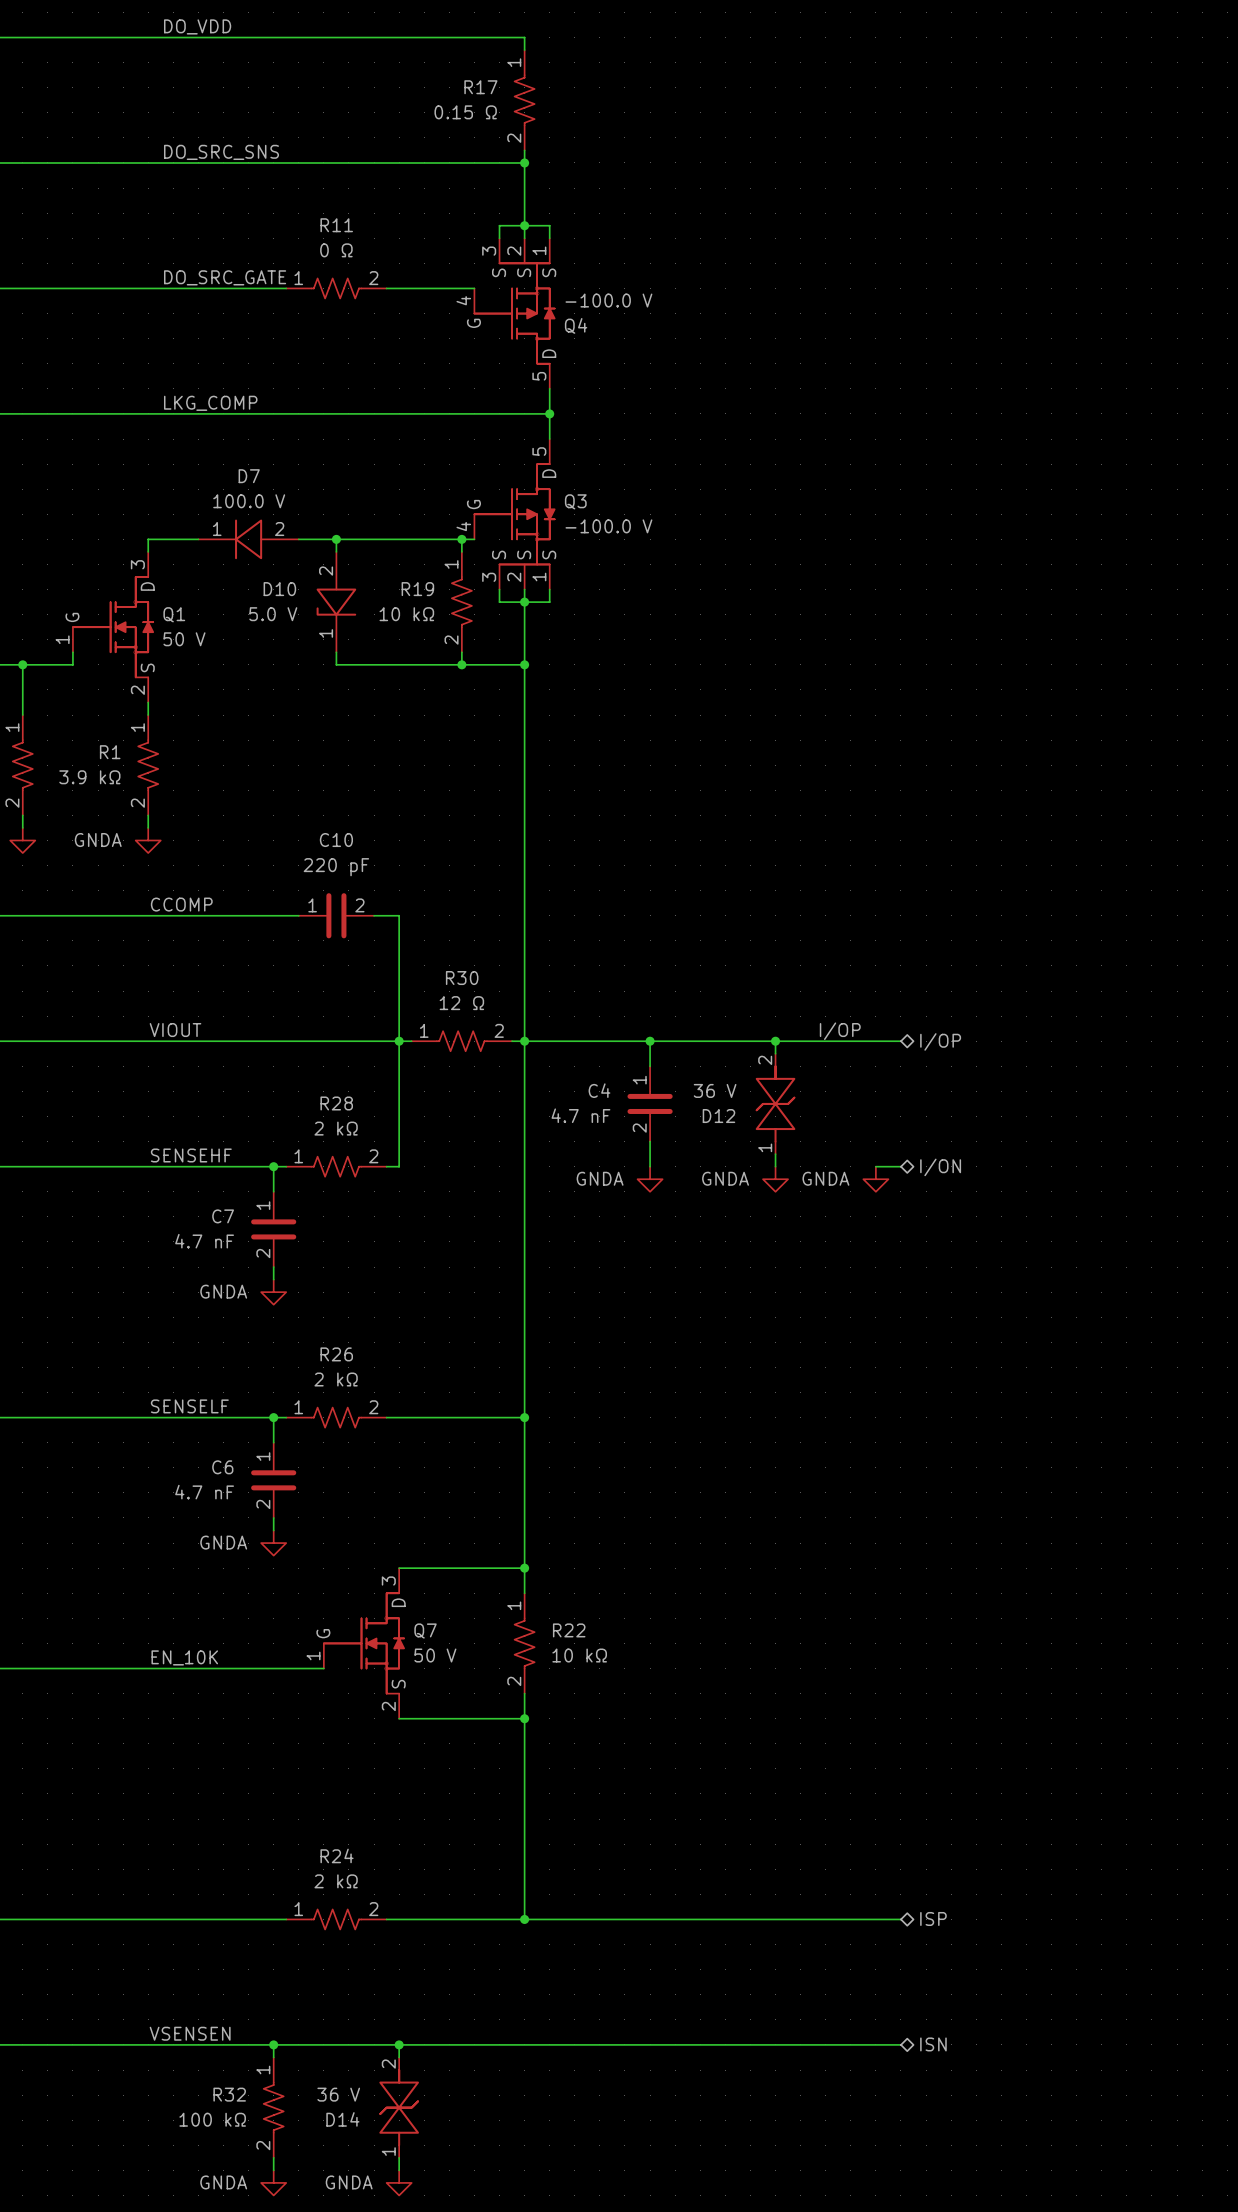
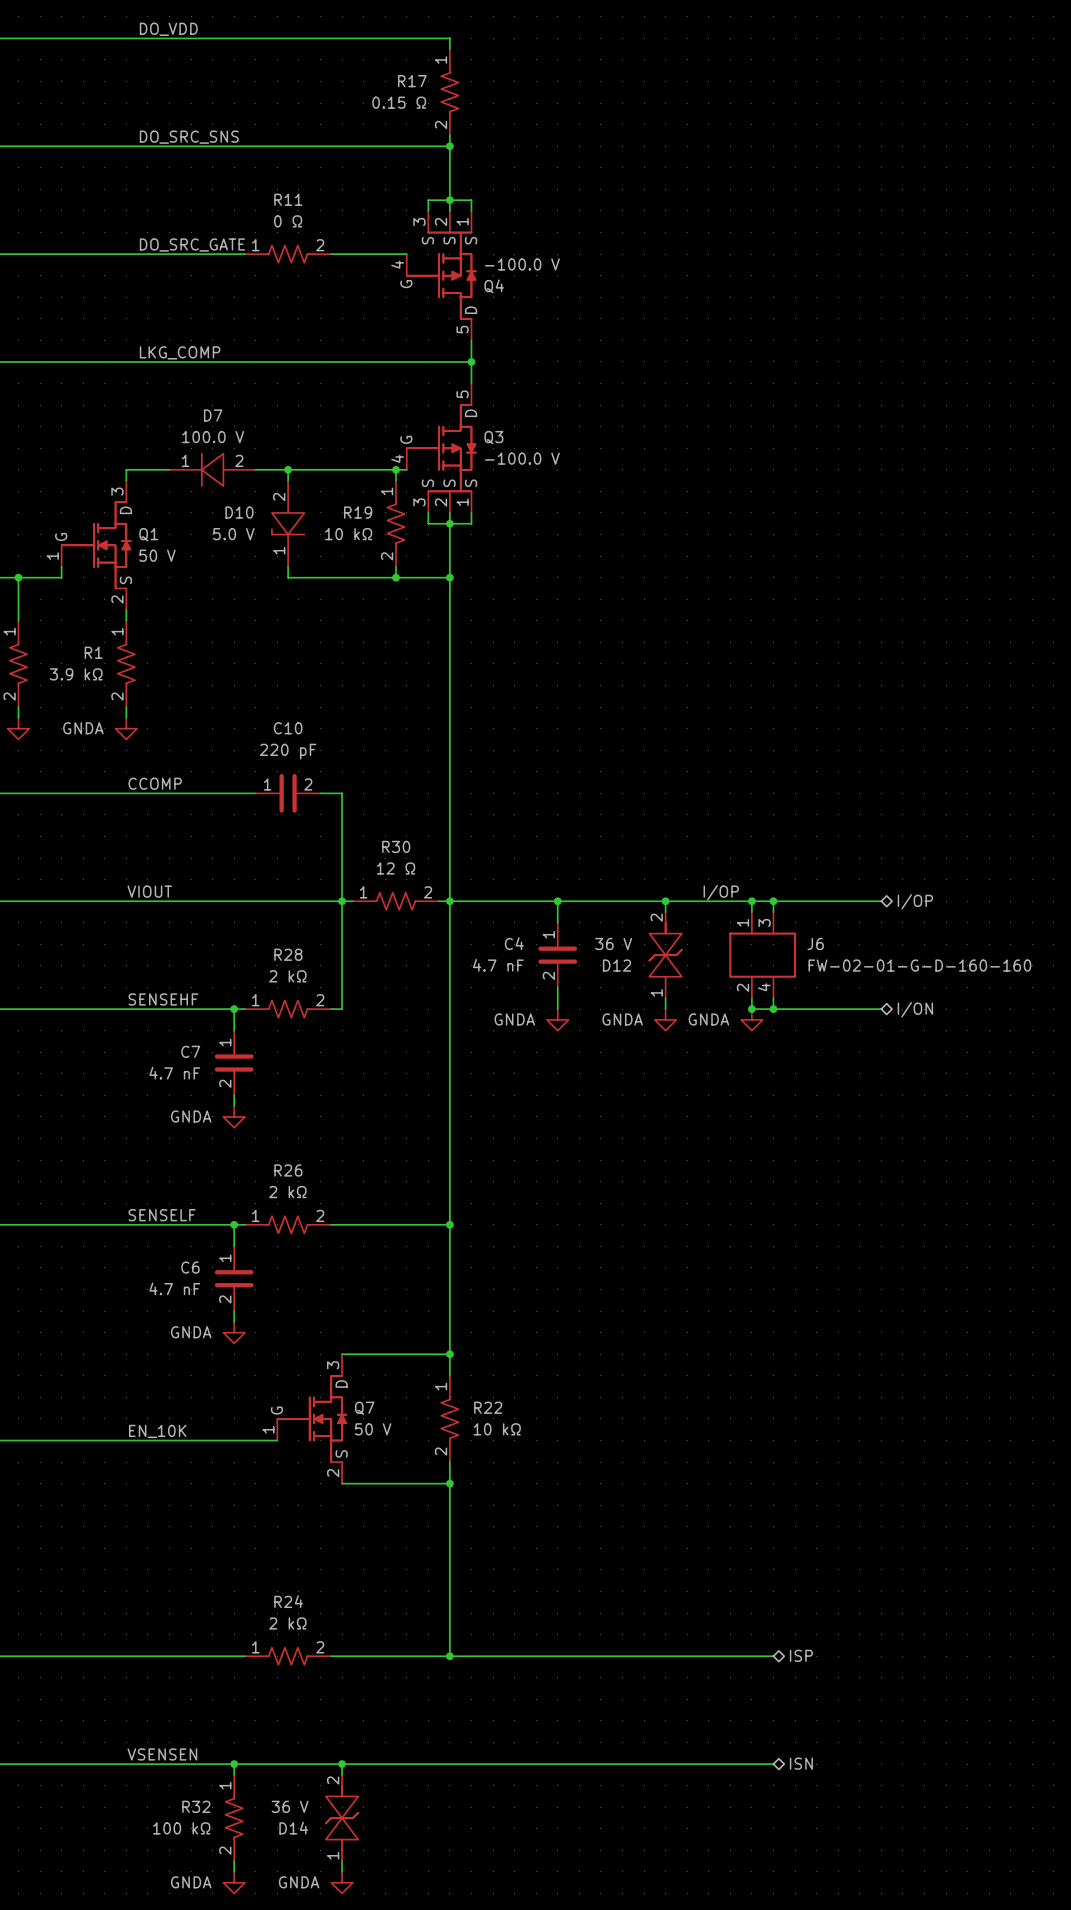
wire: none -> (751, 901) (751, 912)
junction: none -> (751, 901)
junction: none -> (773, 901)
hierarchical label position: I/OP (940, 1041) -> I/OP (915, 901)
wire: none -> (881, 901) (773, 901) (773, 912)
J6: none -> FW-02-01-G-D-160-160 (762, 955)
wire: none -> (751, 998) (751, 1009)
wire: none -> (773, 998) (773, 1009) (881, 1009)
junction: none -> (751, 1009)
junction: none -> (773, 1009)
hierarchical label position: I/ON (940, 1167) -> I/ON (915, 1009)

